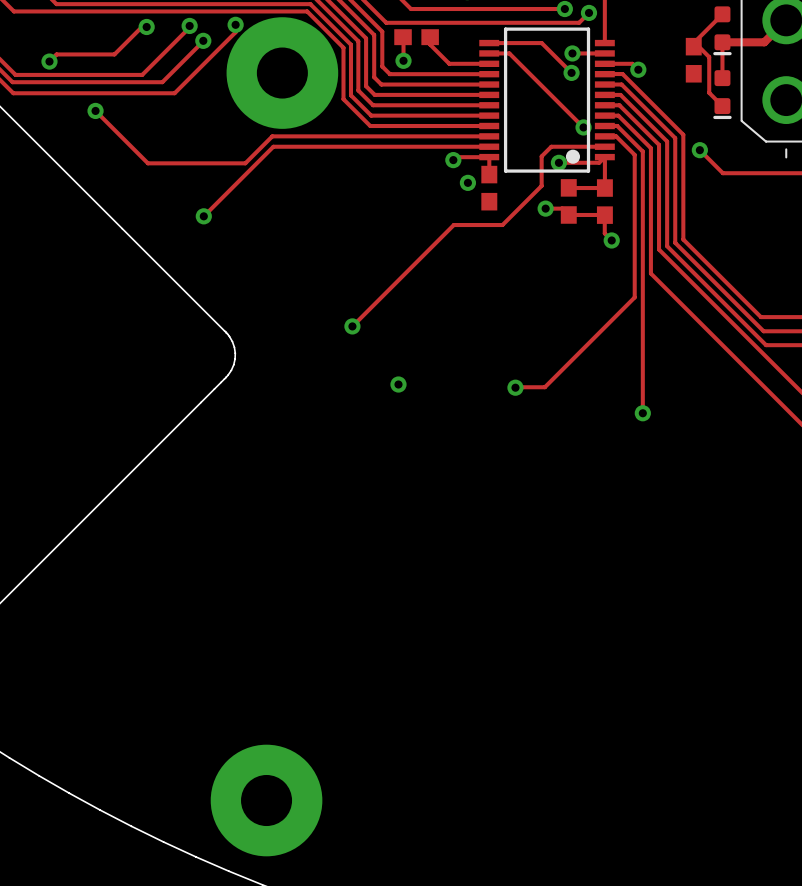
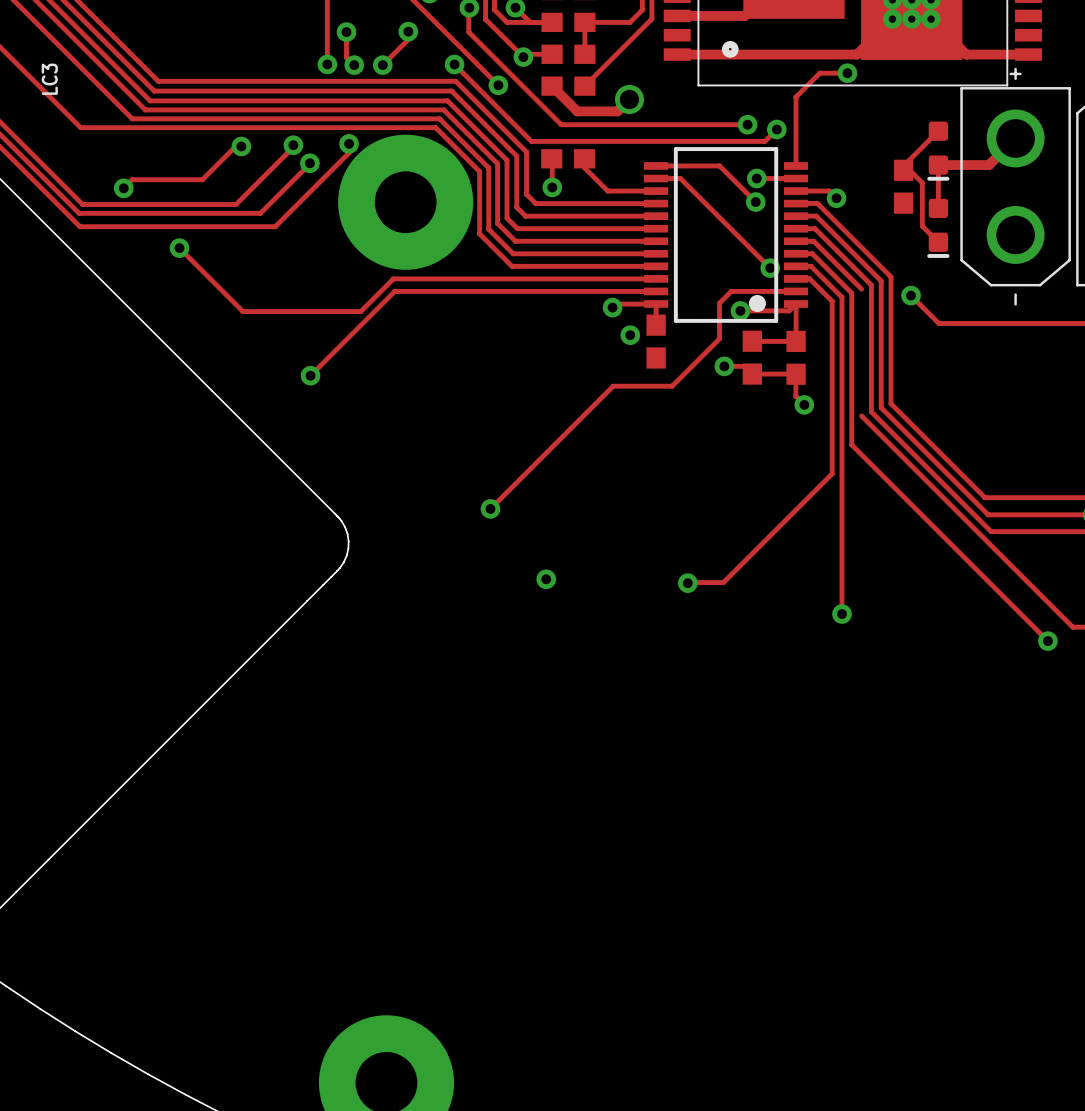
track: (659, 144) (659, 249) -> none

